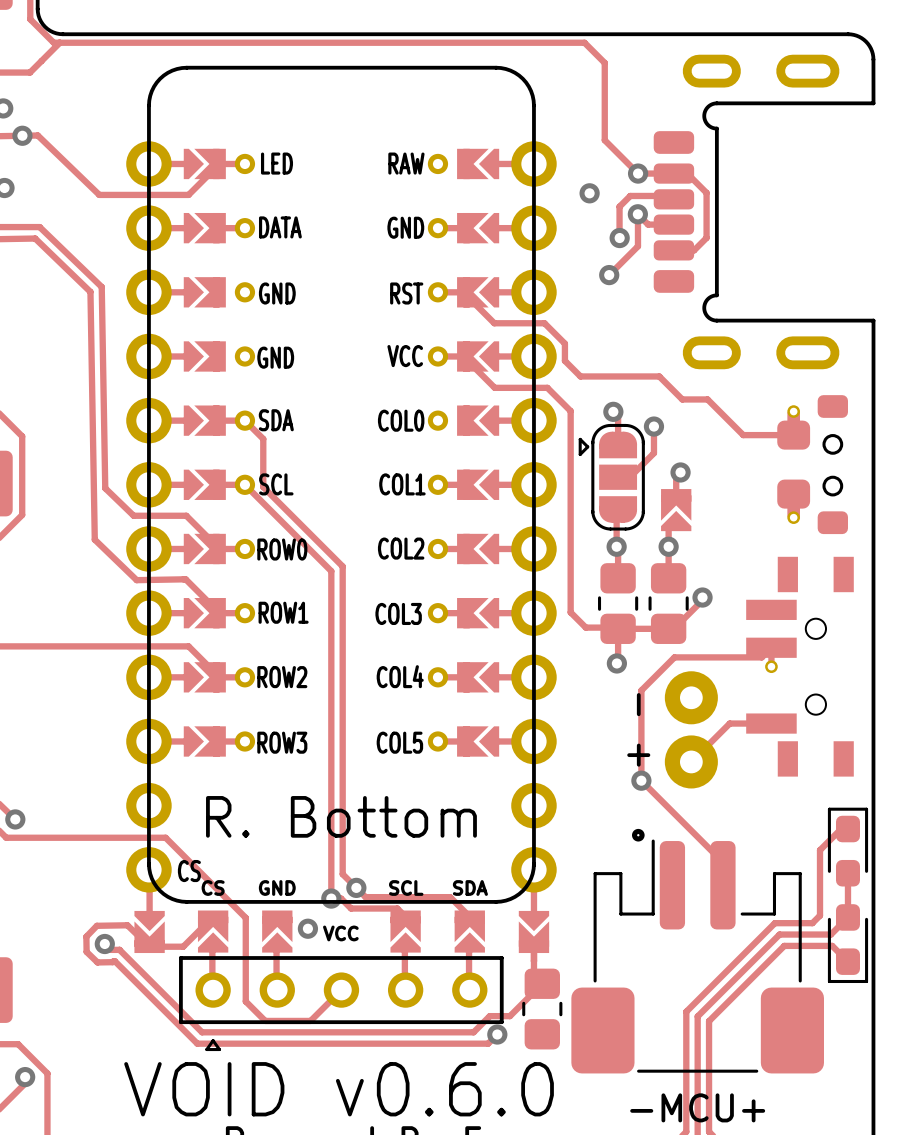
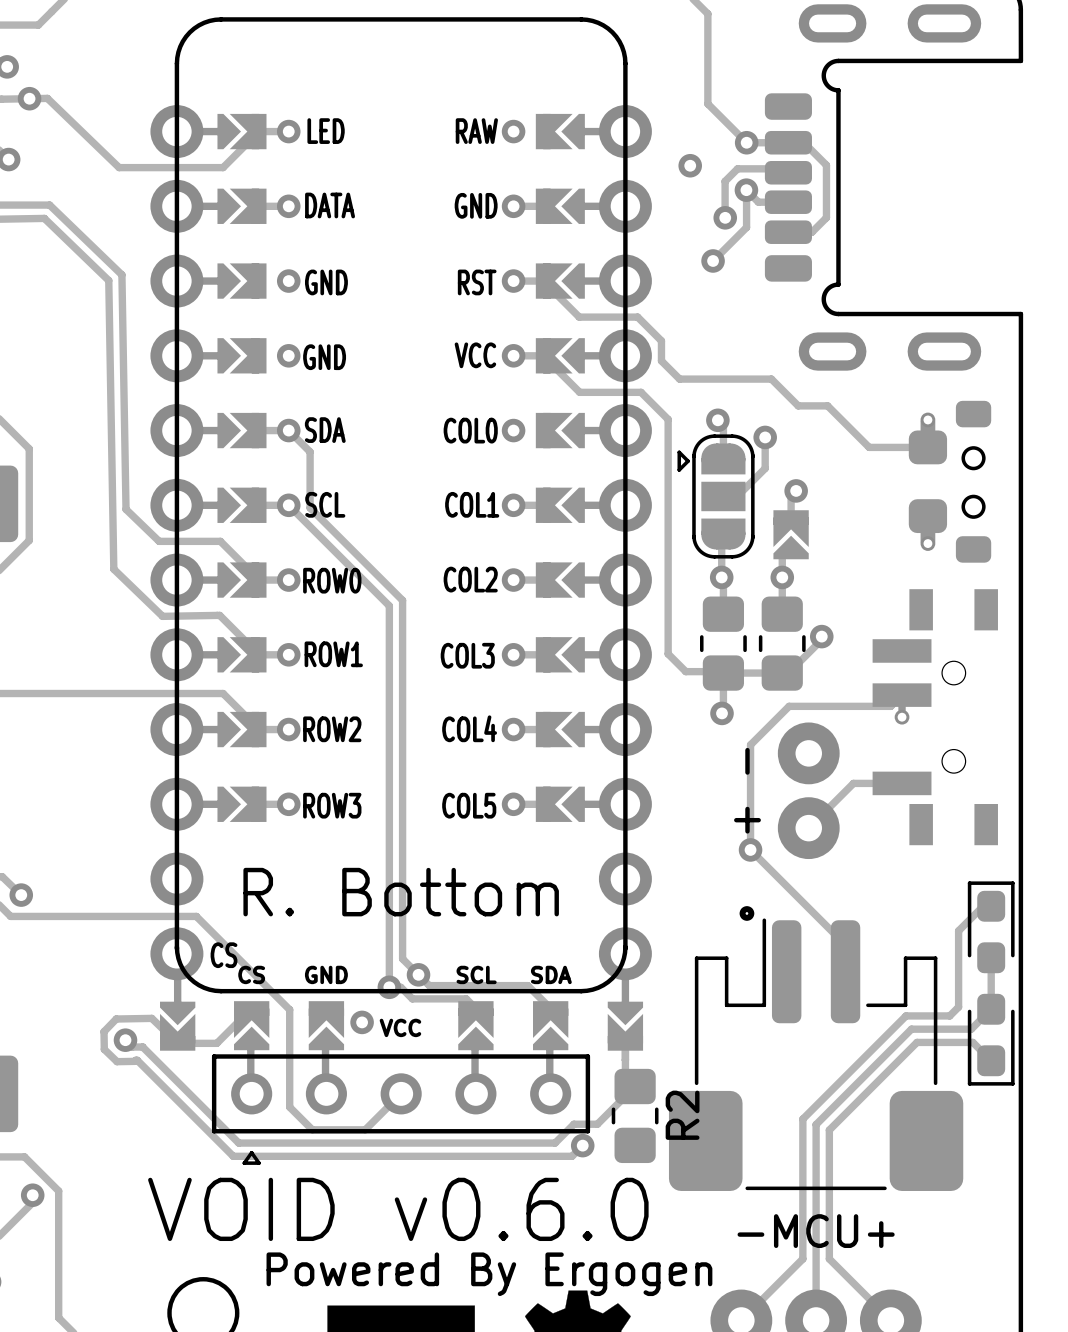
R2 name: none -> R2 (682, 1115)

